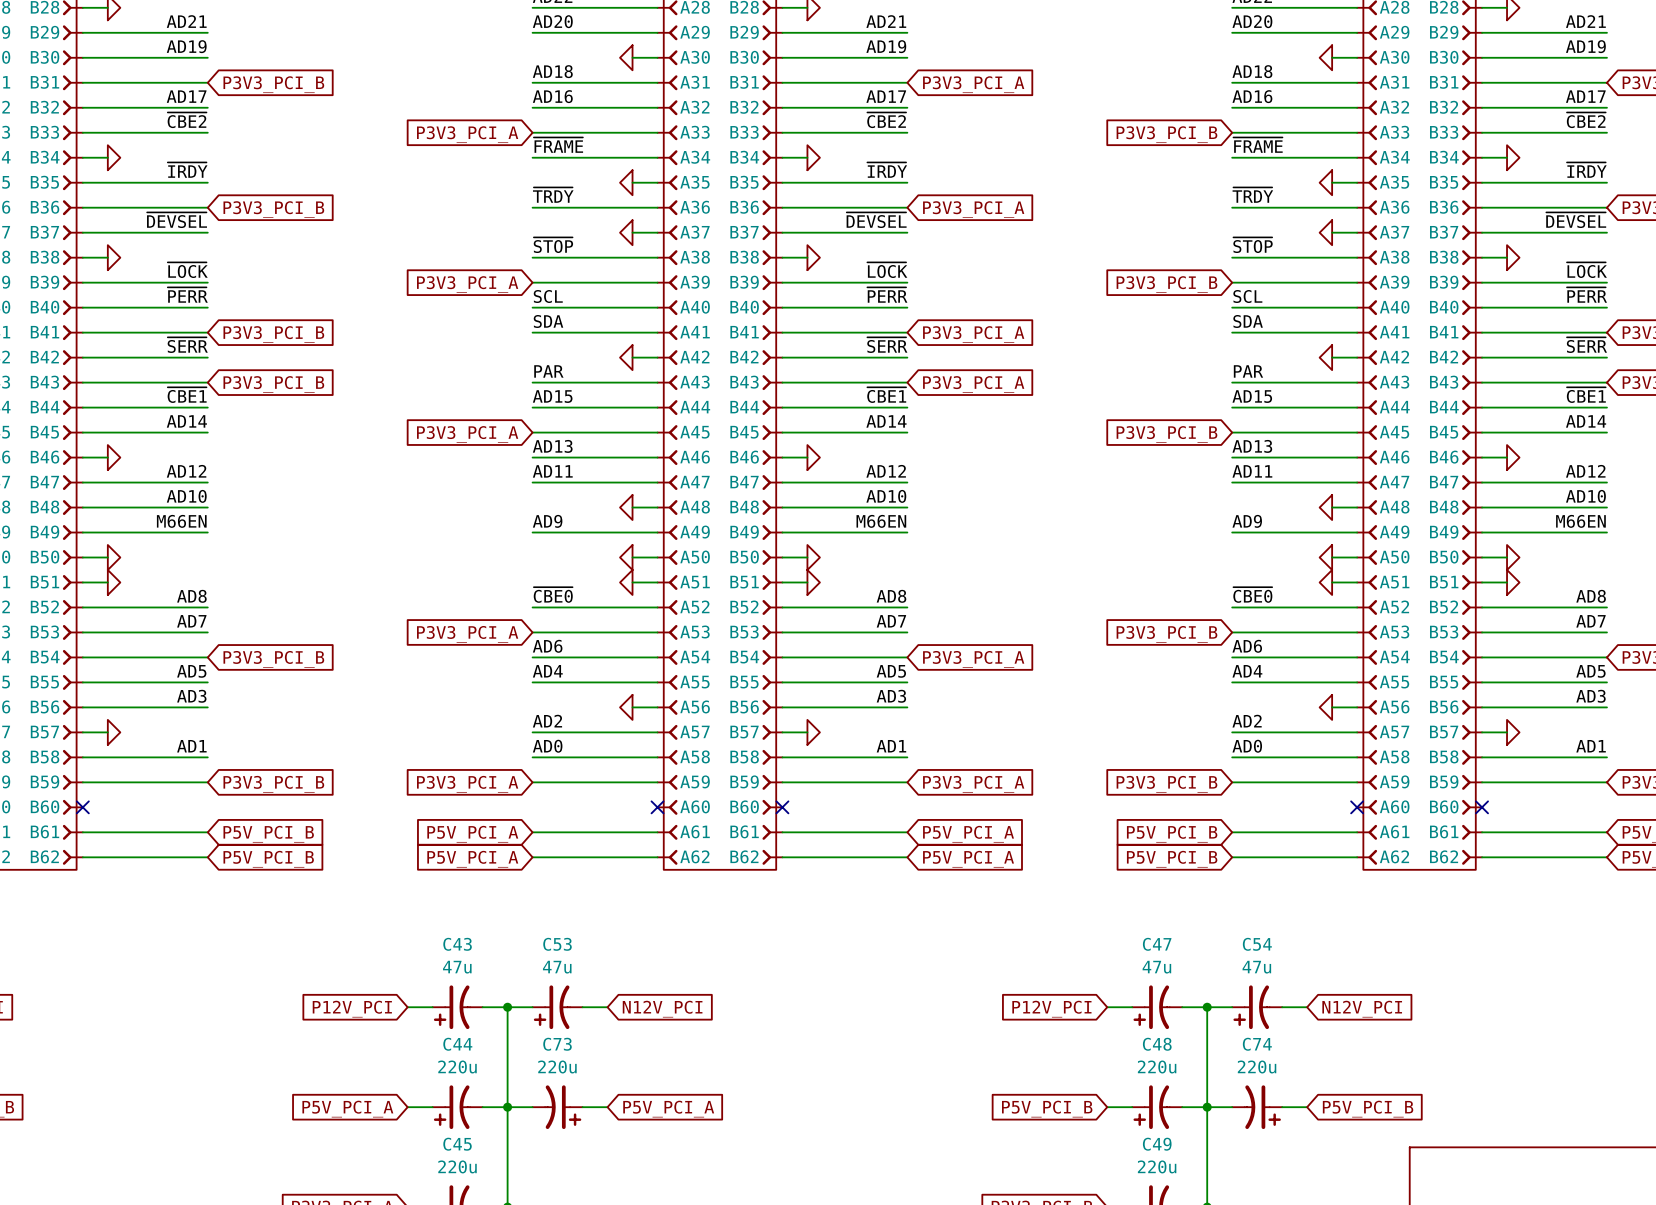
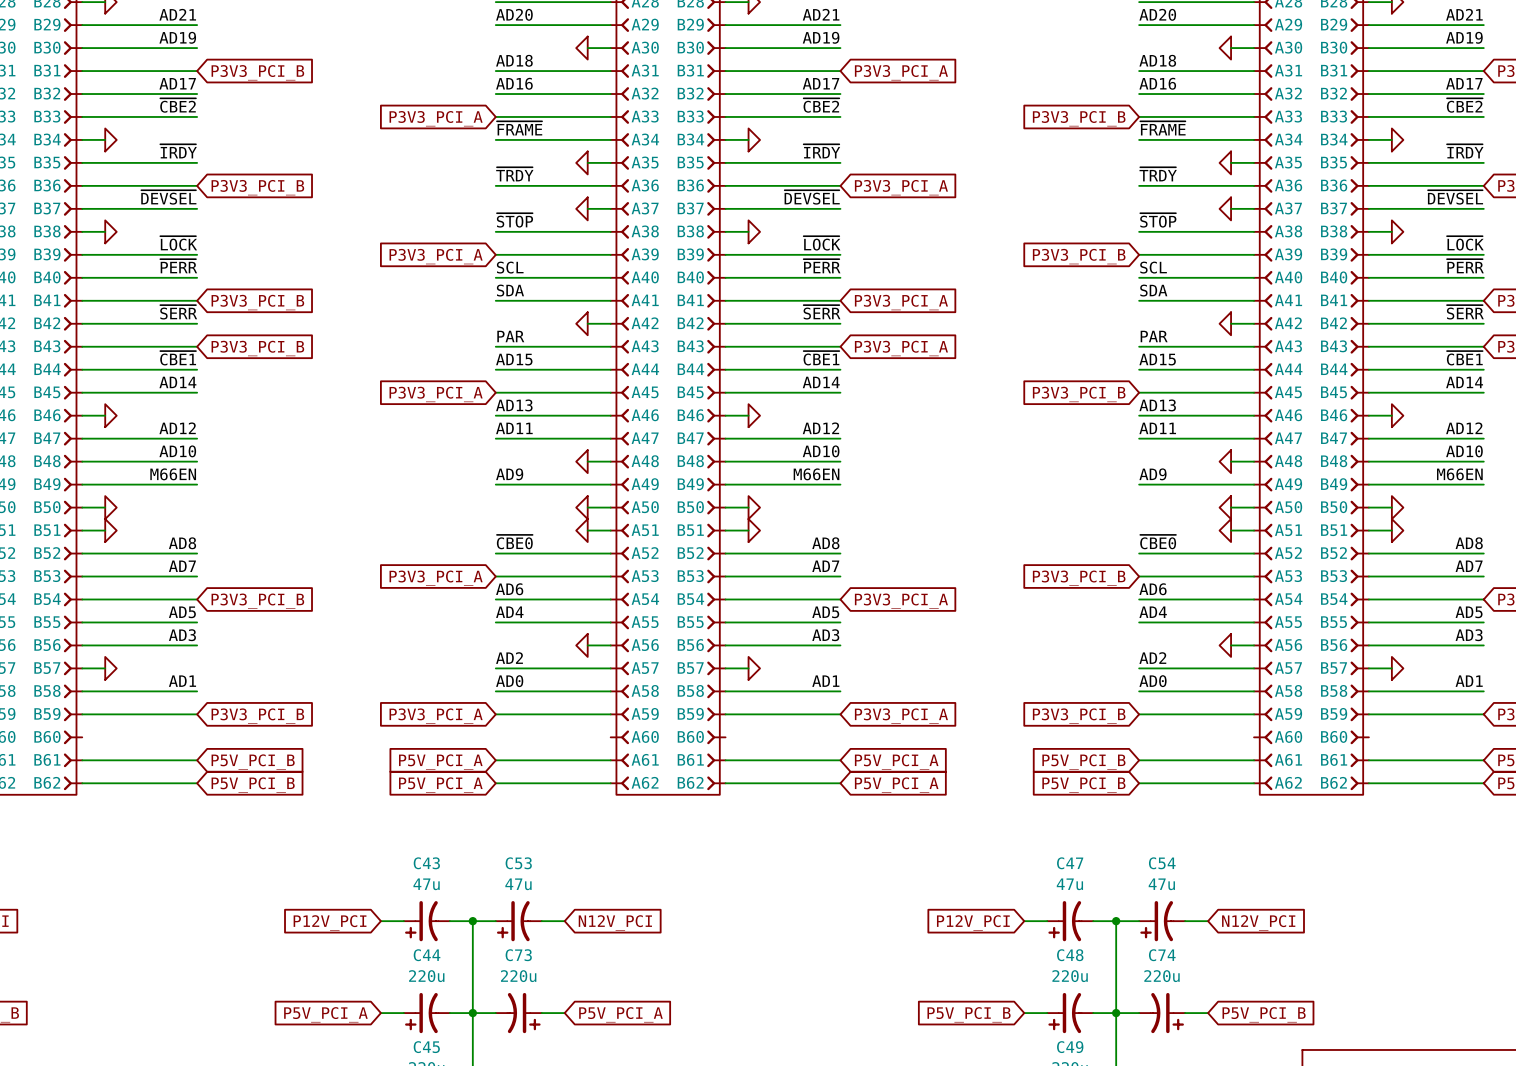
no-connect mark: (82, 807) -> none
no-connect mark: (657, 807) -> none
no-connect mark: (782, 807) -> none
no-connect mark: (1357, 807) -> none
no-connect mark: (1482, 807) -> none

